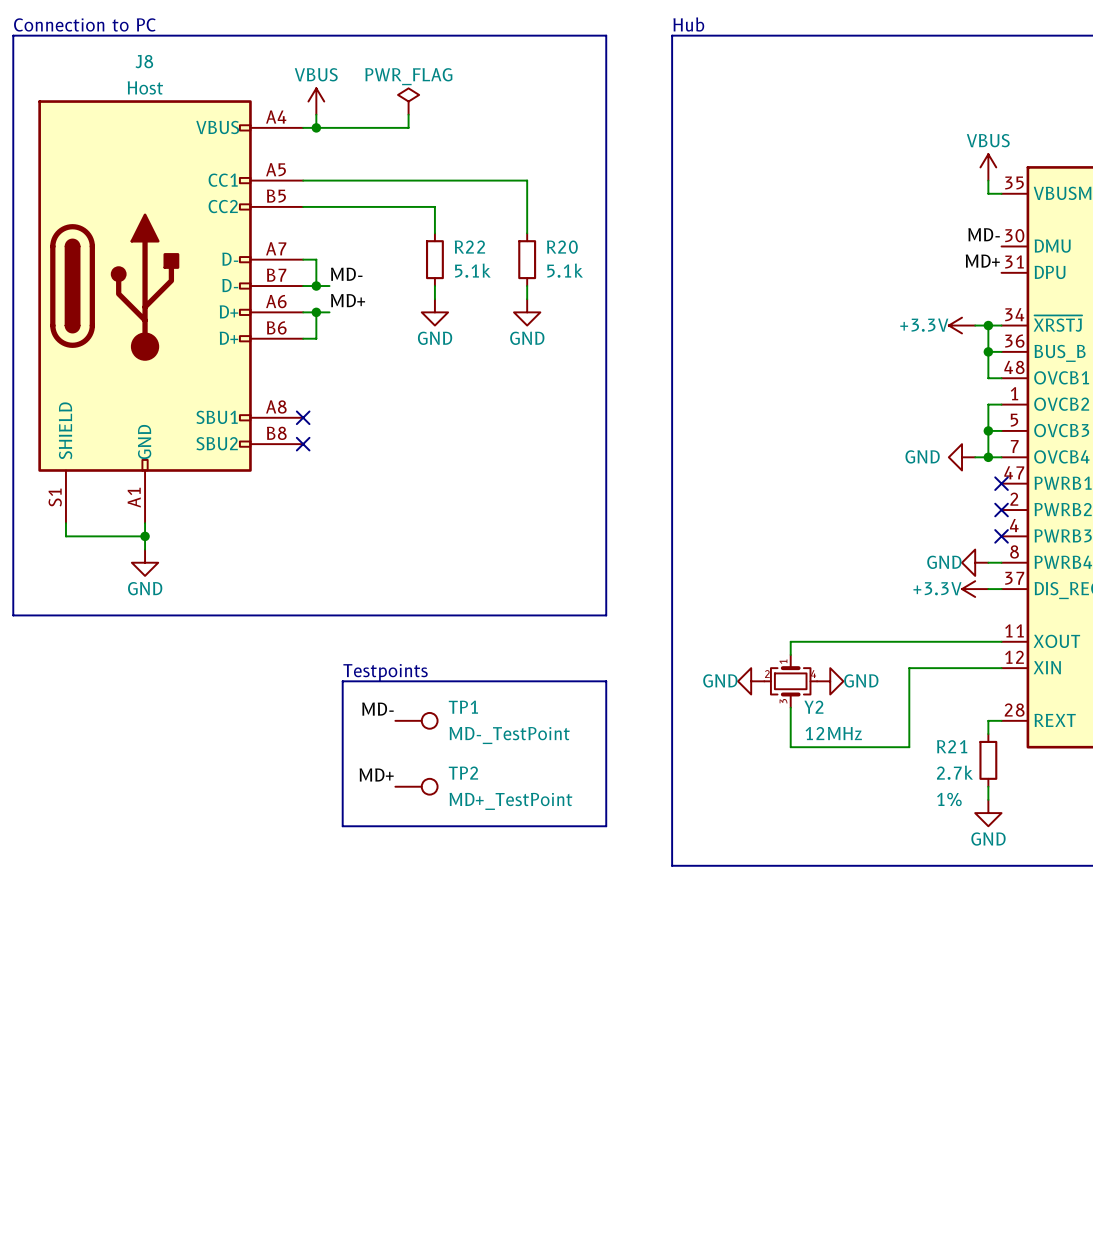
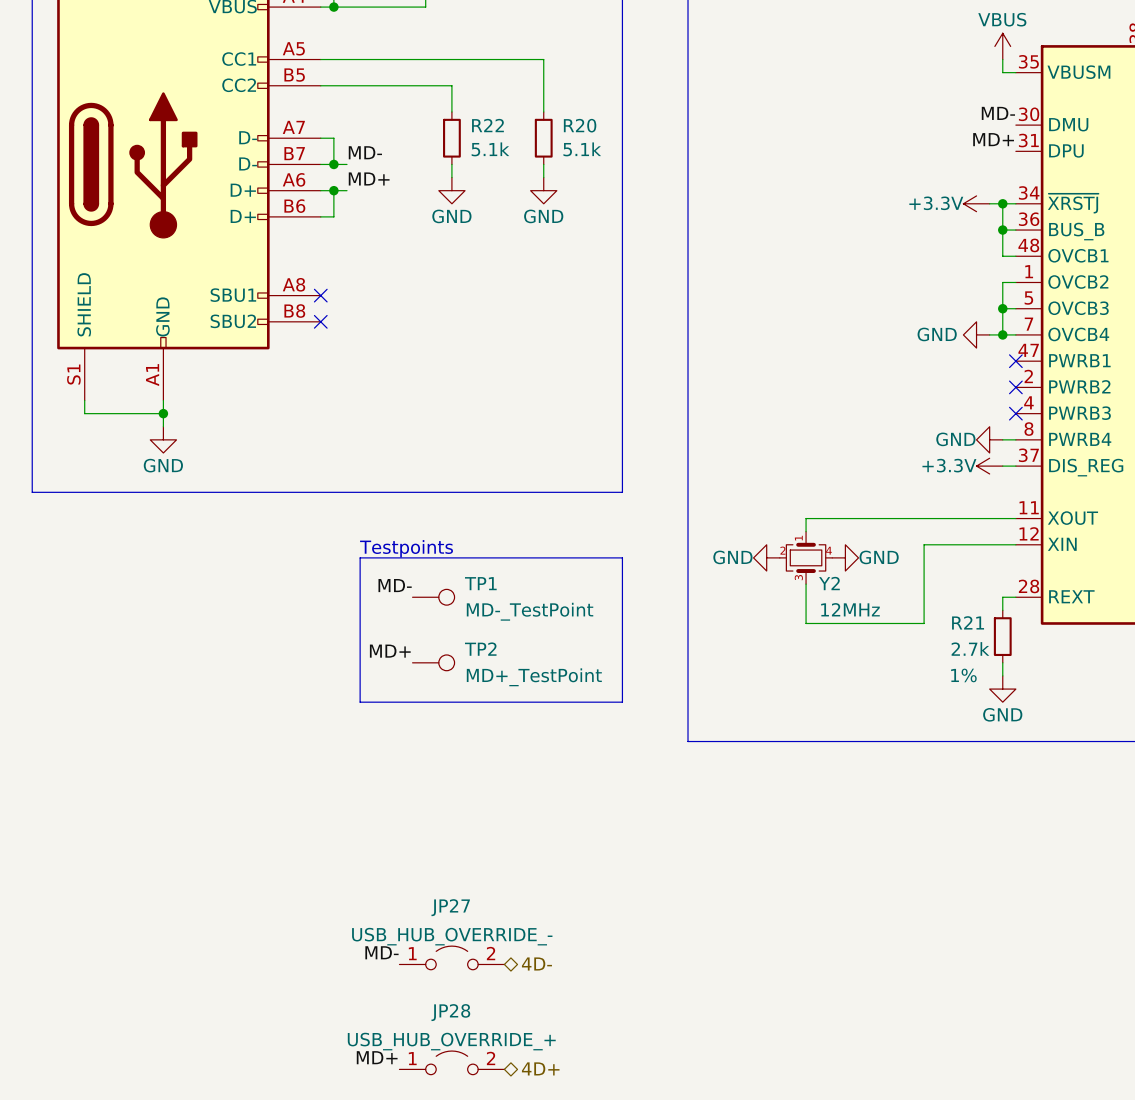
label: none -> MD- (381, 952)
JP27: none -> USB_HUB_OVERRIDE_- (451, 957)
hierarchical label: none -> 4D- (536, 963)
label: none -> MD+ (377, 1057)
JP28: none -> USB_HUB_OVERRIDE_+ (451, 1062)
hierarchical label: none -> 4D+ (540, 1068)

